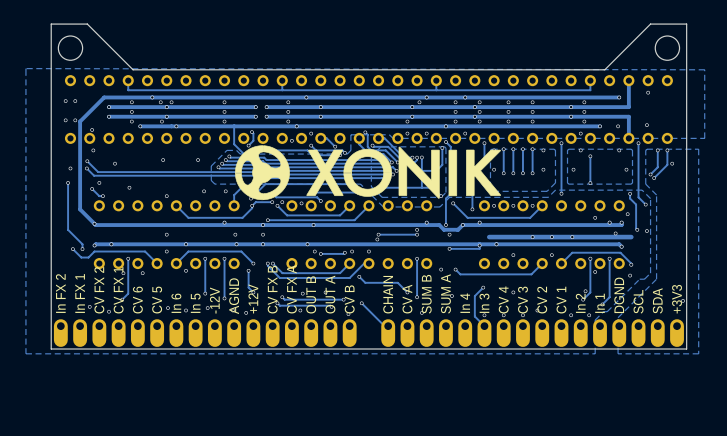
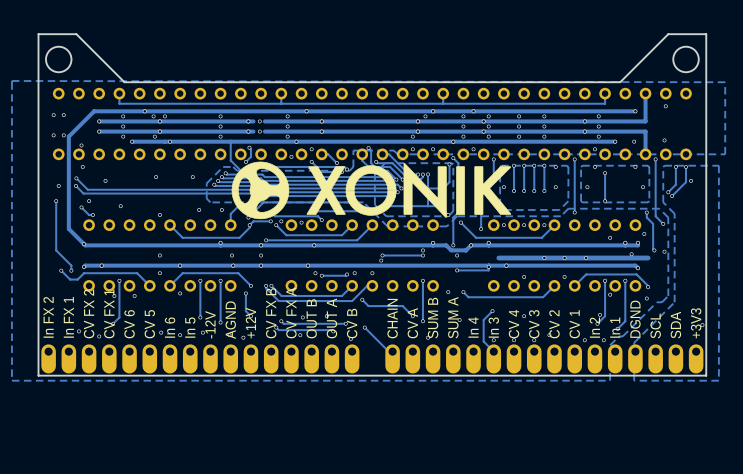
via: none -> (248, 121)
via: (255, 107) -> none
via: none -> (259, 121)
via: (266, 107) -> none
via: none -> (248, 131)
via: (255, 116) -> none
via: none -> (259, 131)
via: (266, 116) -> none

